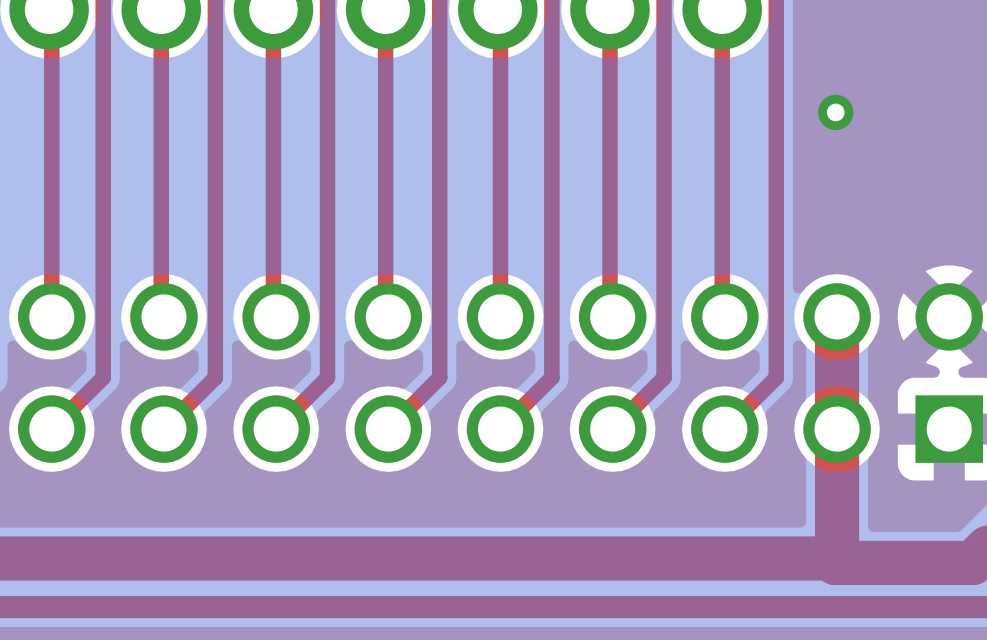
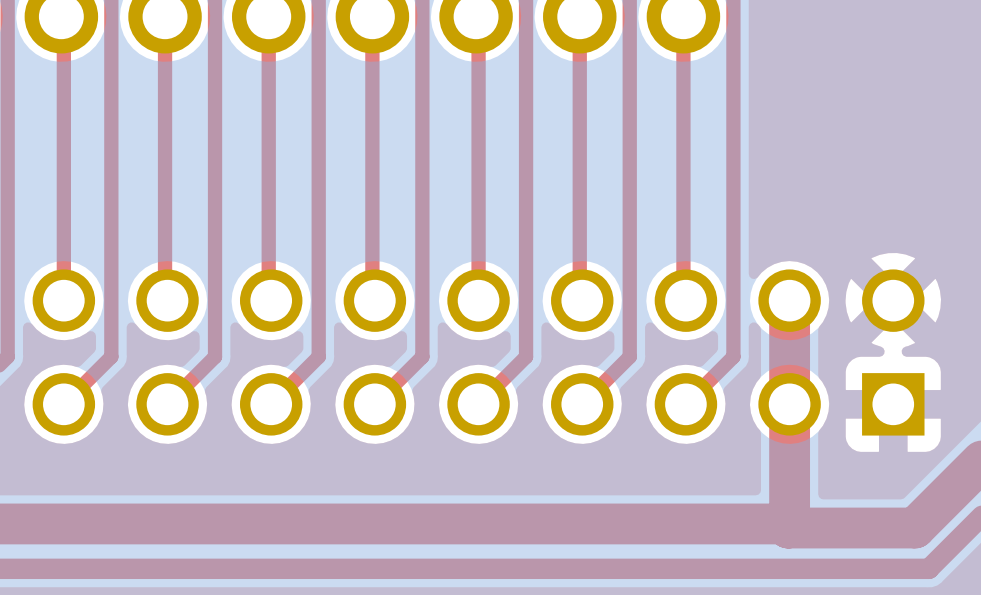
via: (835, 112) -> none

